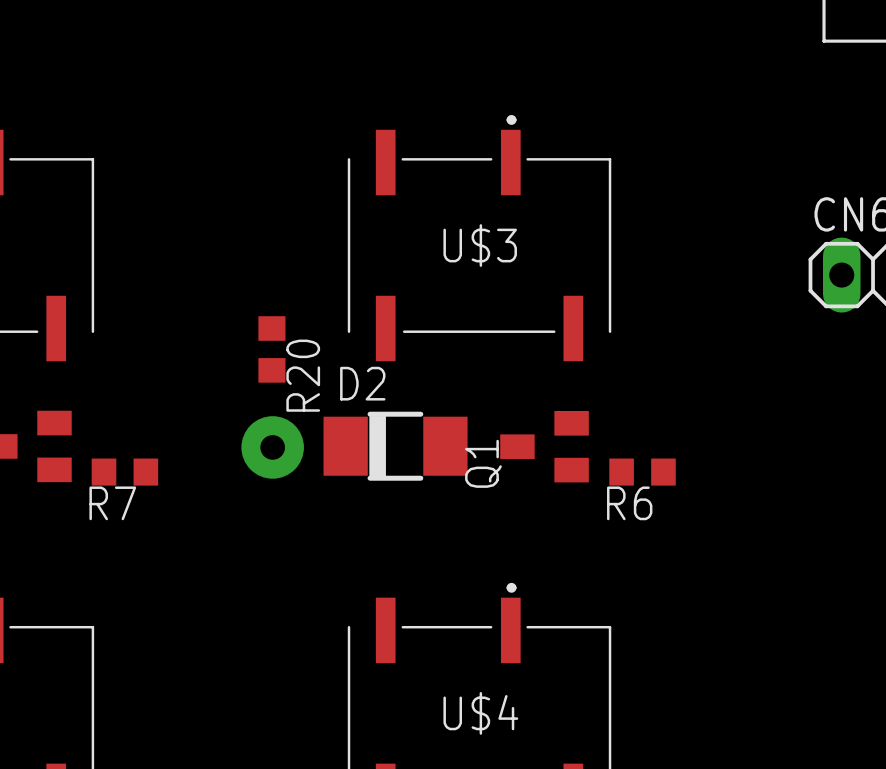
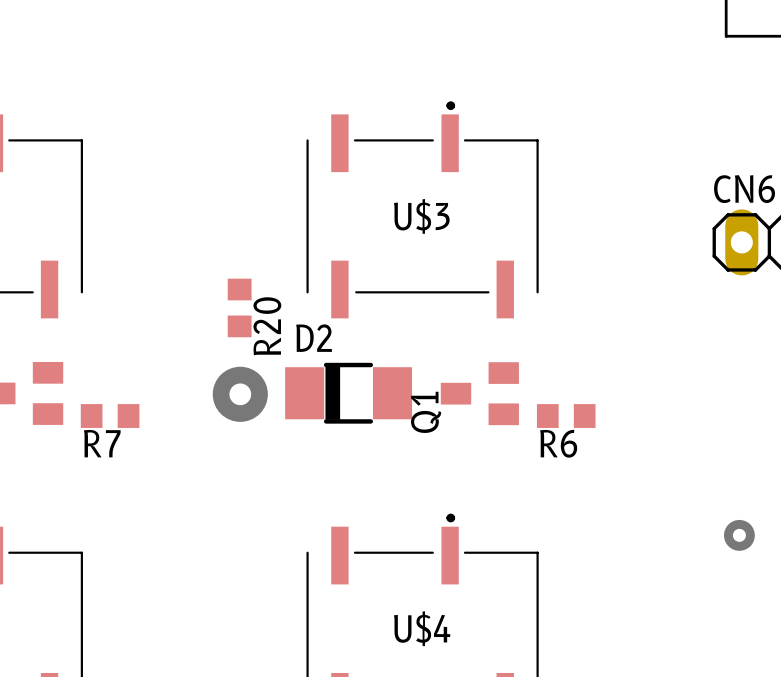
via: none -> (739, 535)

